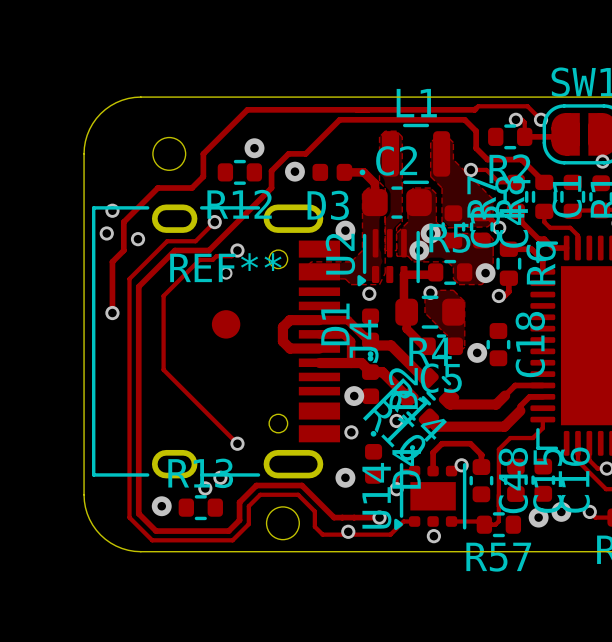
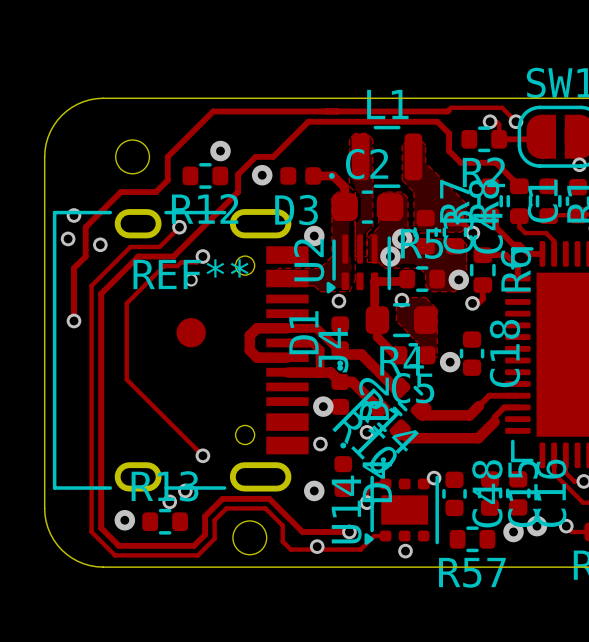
track: (470, 169) (486, 169) (498, 182) (515, 182) -> none
via: (470, 169) -> none
track: (542, 419) (542, 428) (532, 438) (510, 438) (498, 449) (498, 521) (495, 524) (484, 524) -> none
track: (481, 467) (481, 455) (470, 443) (442, 443) (433, 452) (433, 471) -> none
track: (451, 521) (477, 521) (481, 524) -> none

